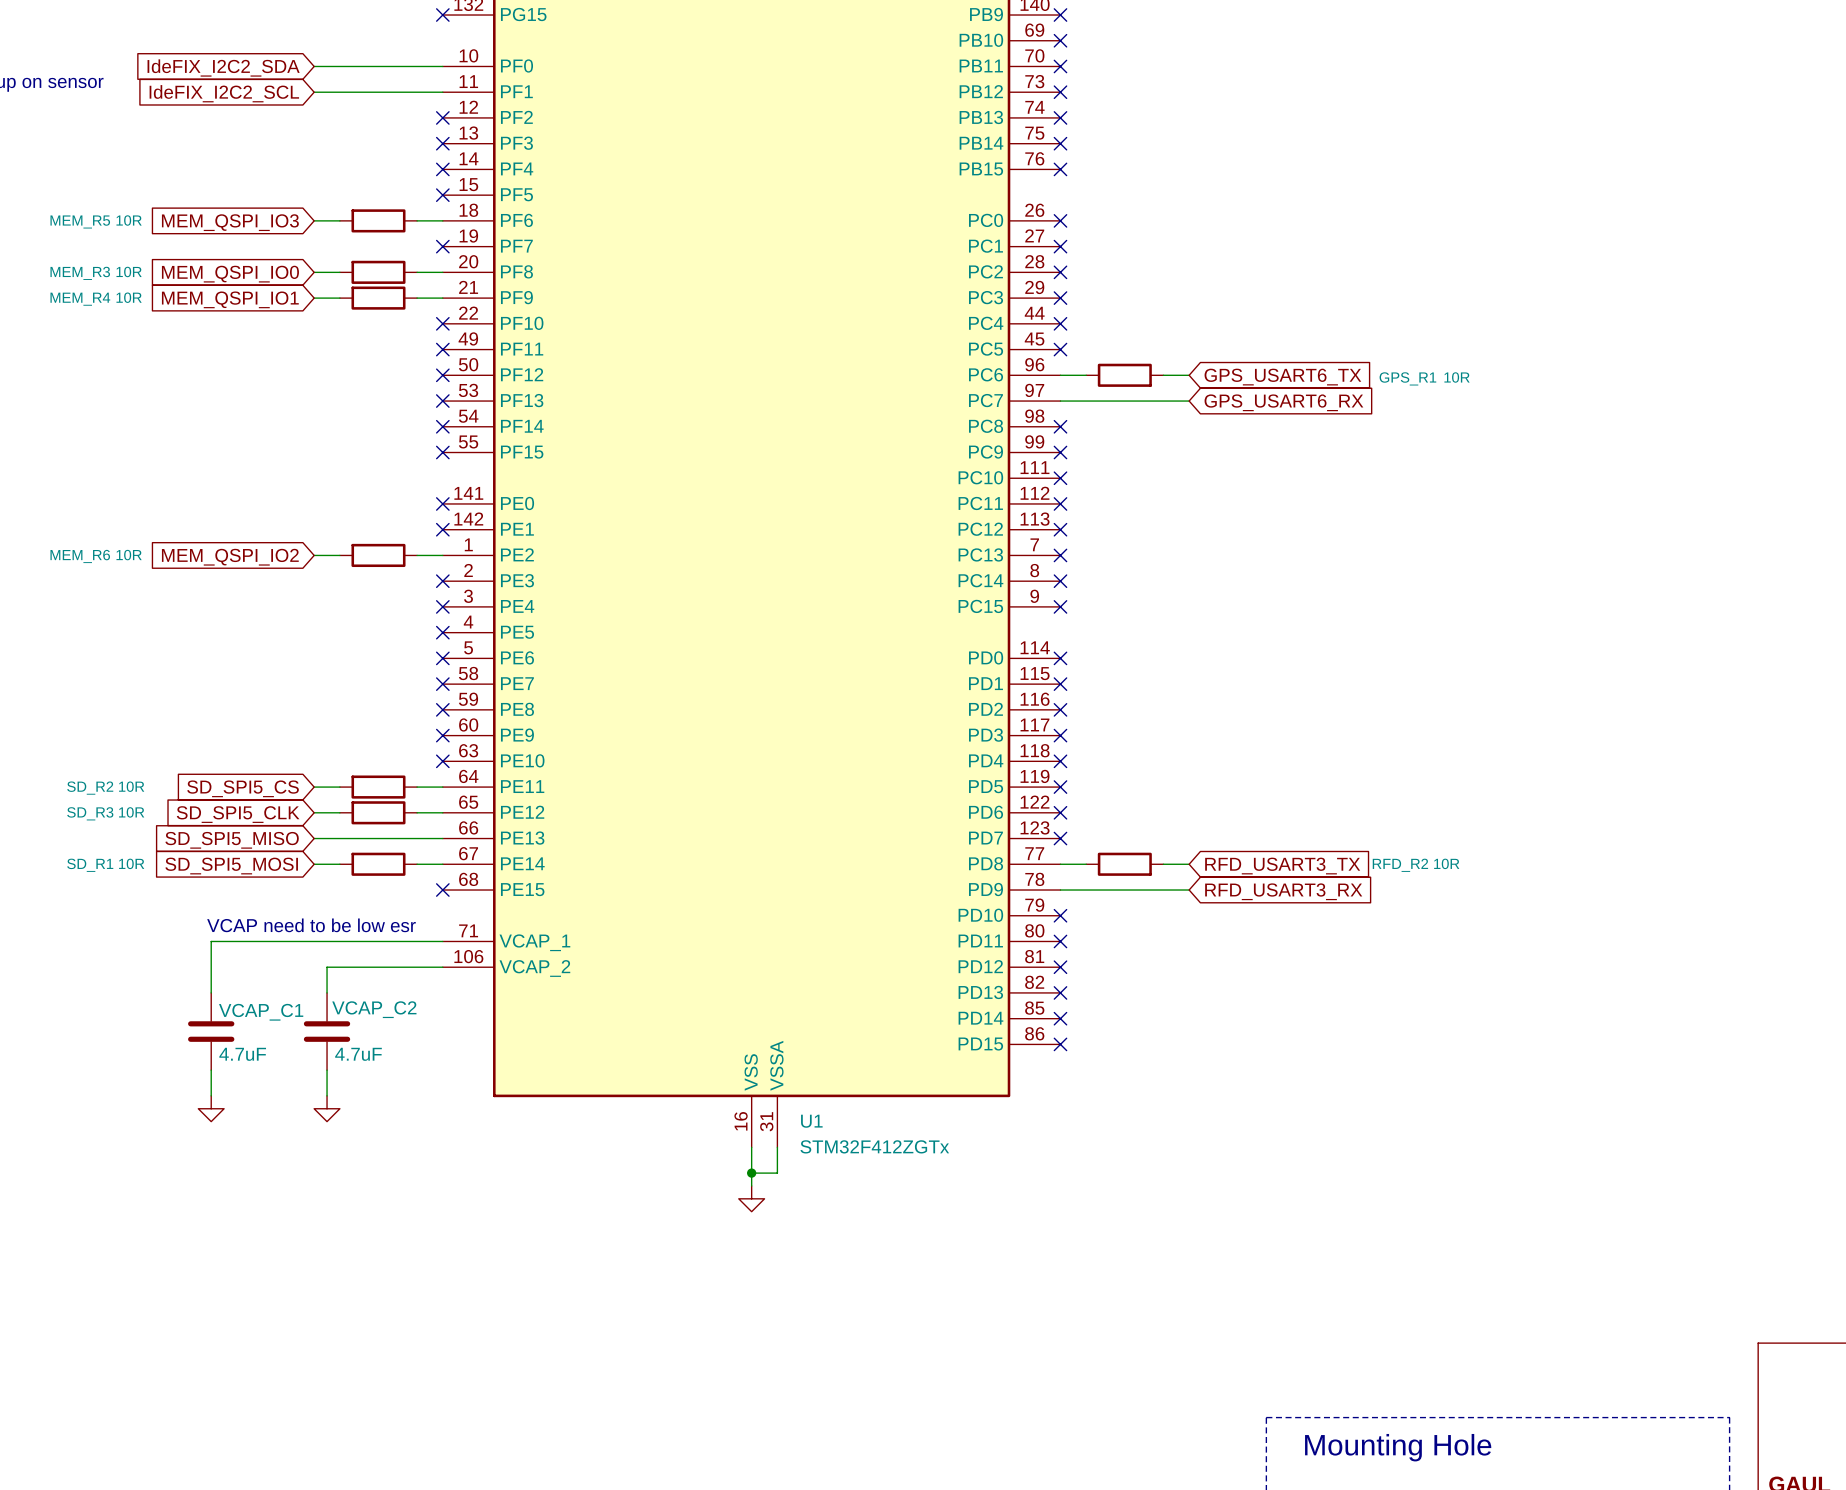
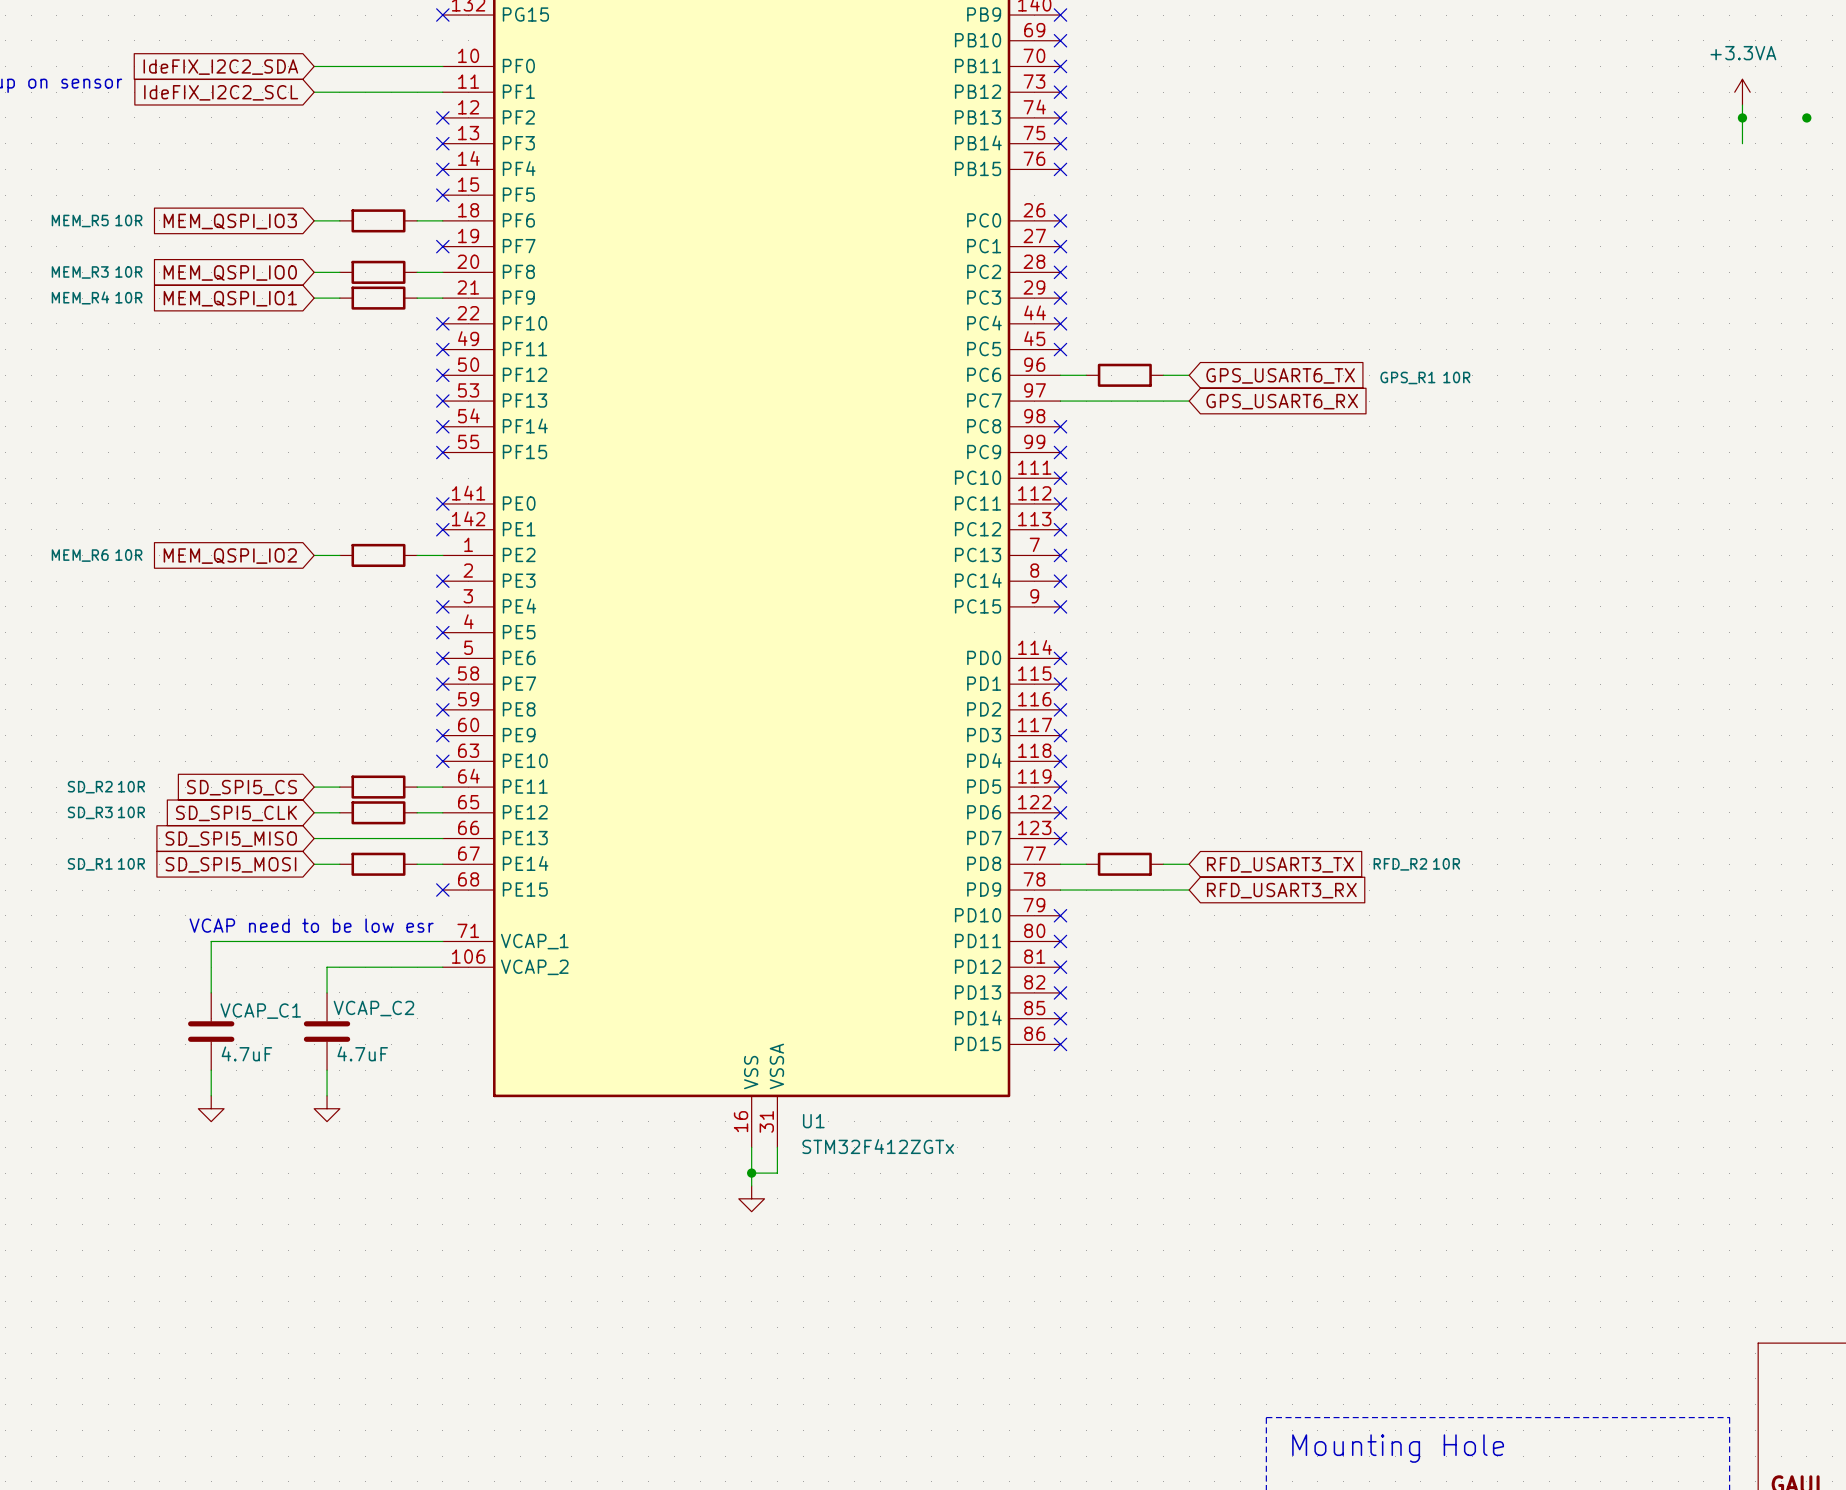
power symbol: none -> +3.3VA (1742, 92)
wire: none -> (1742, 105) (1742, 143)
junction: none -> (1742, 117)
junction: none -> (1806, 117)

